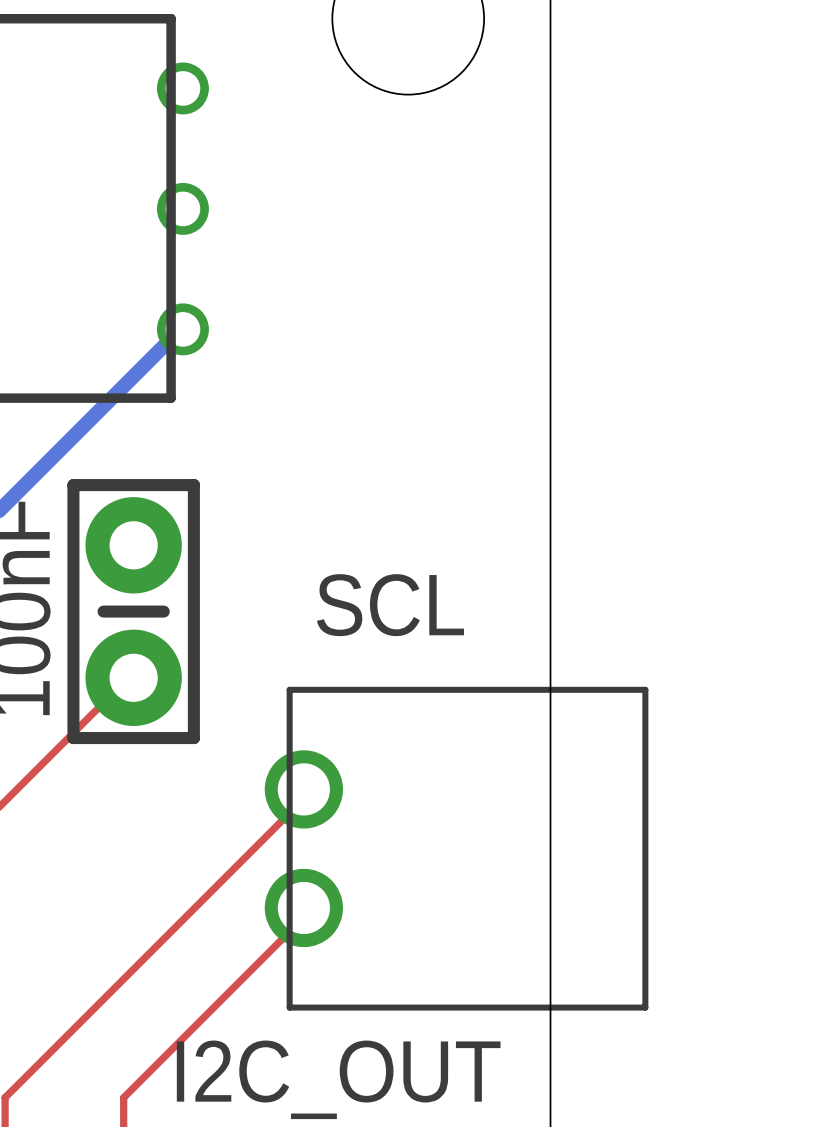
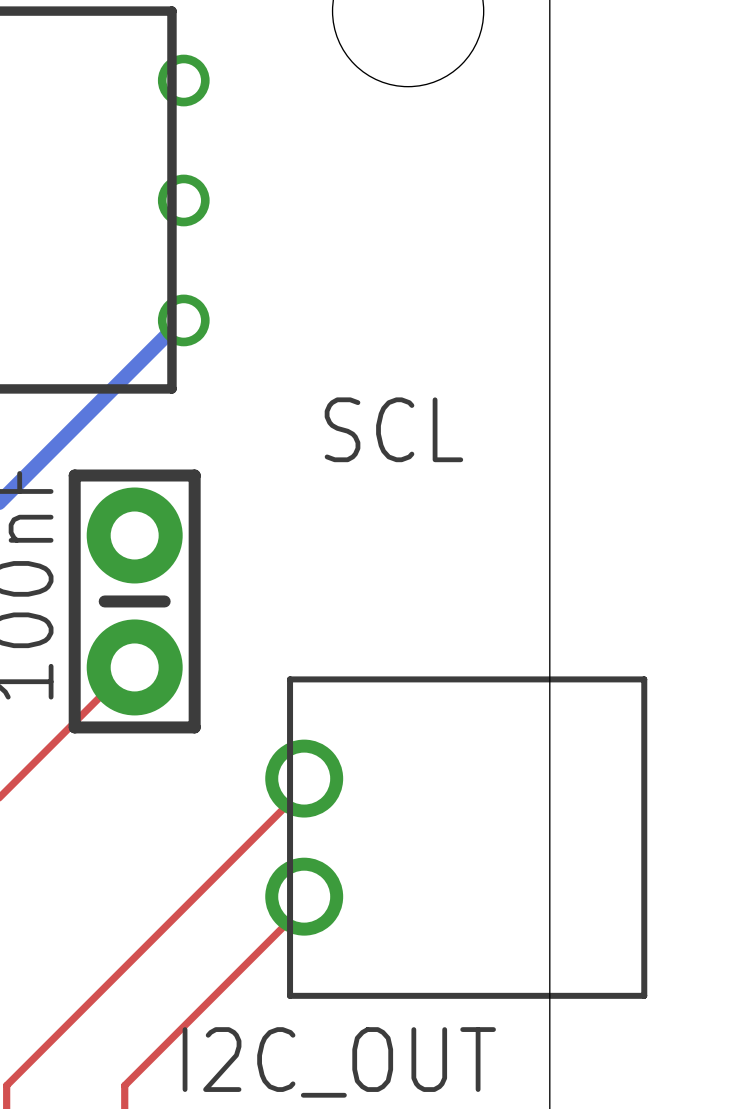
text position: SCL (390, 605) -> SCL (393, 429)

